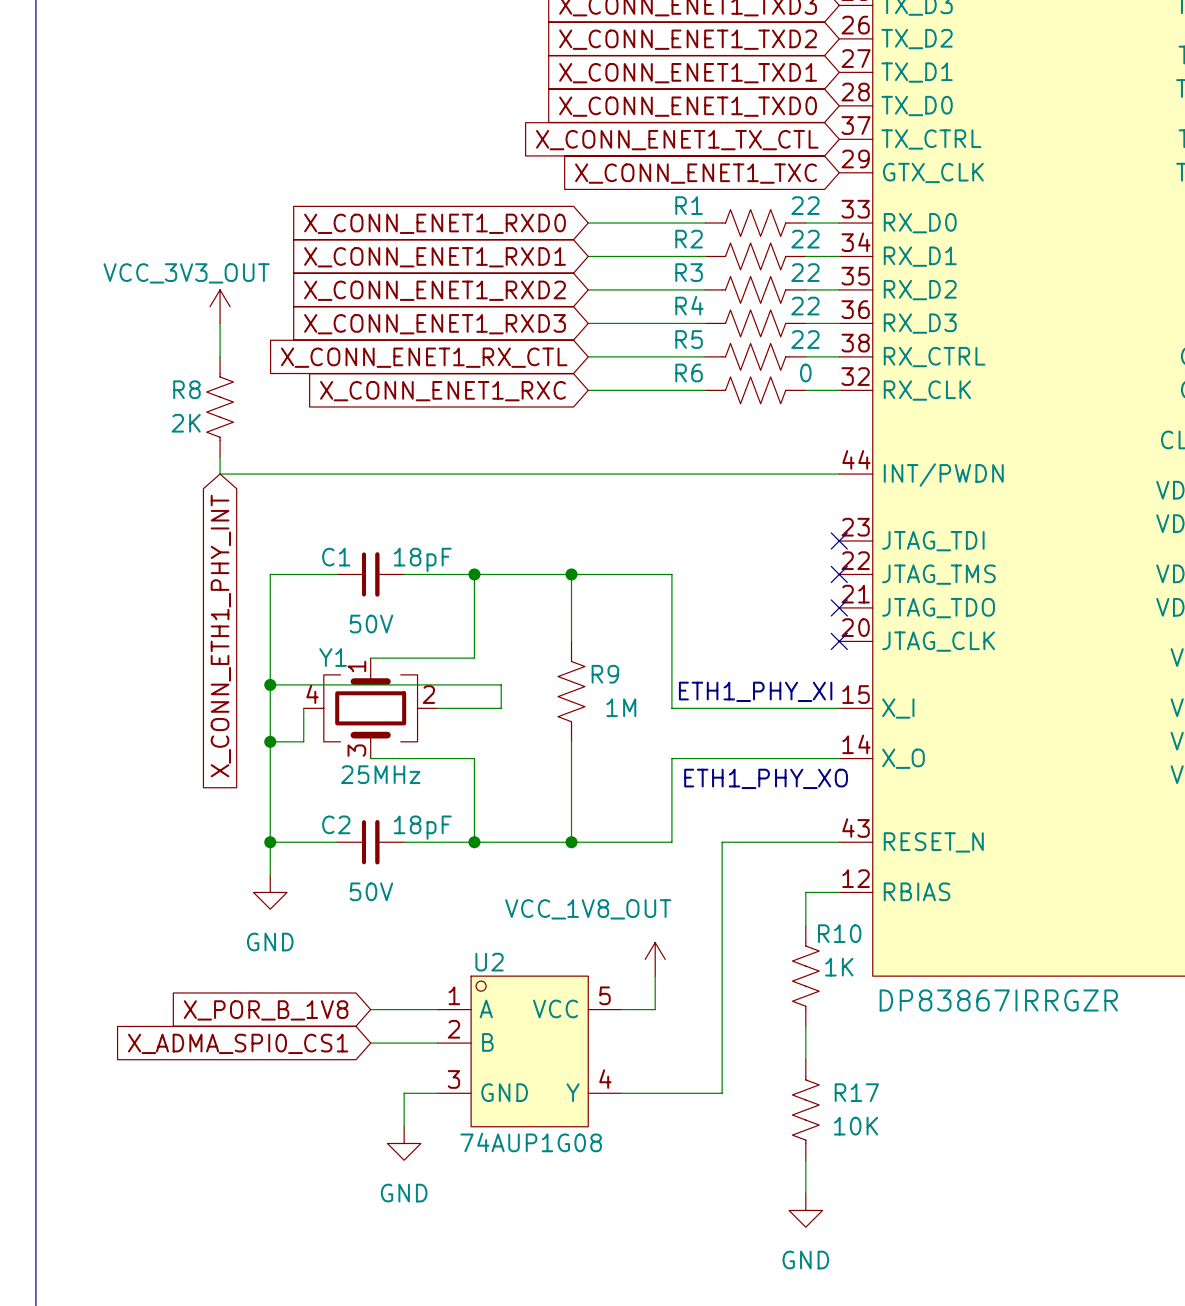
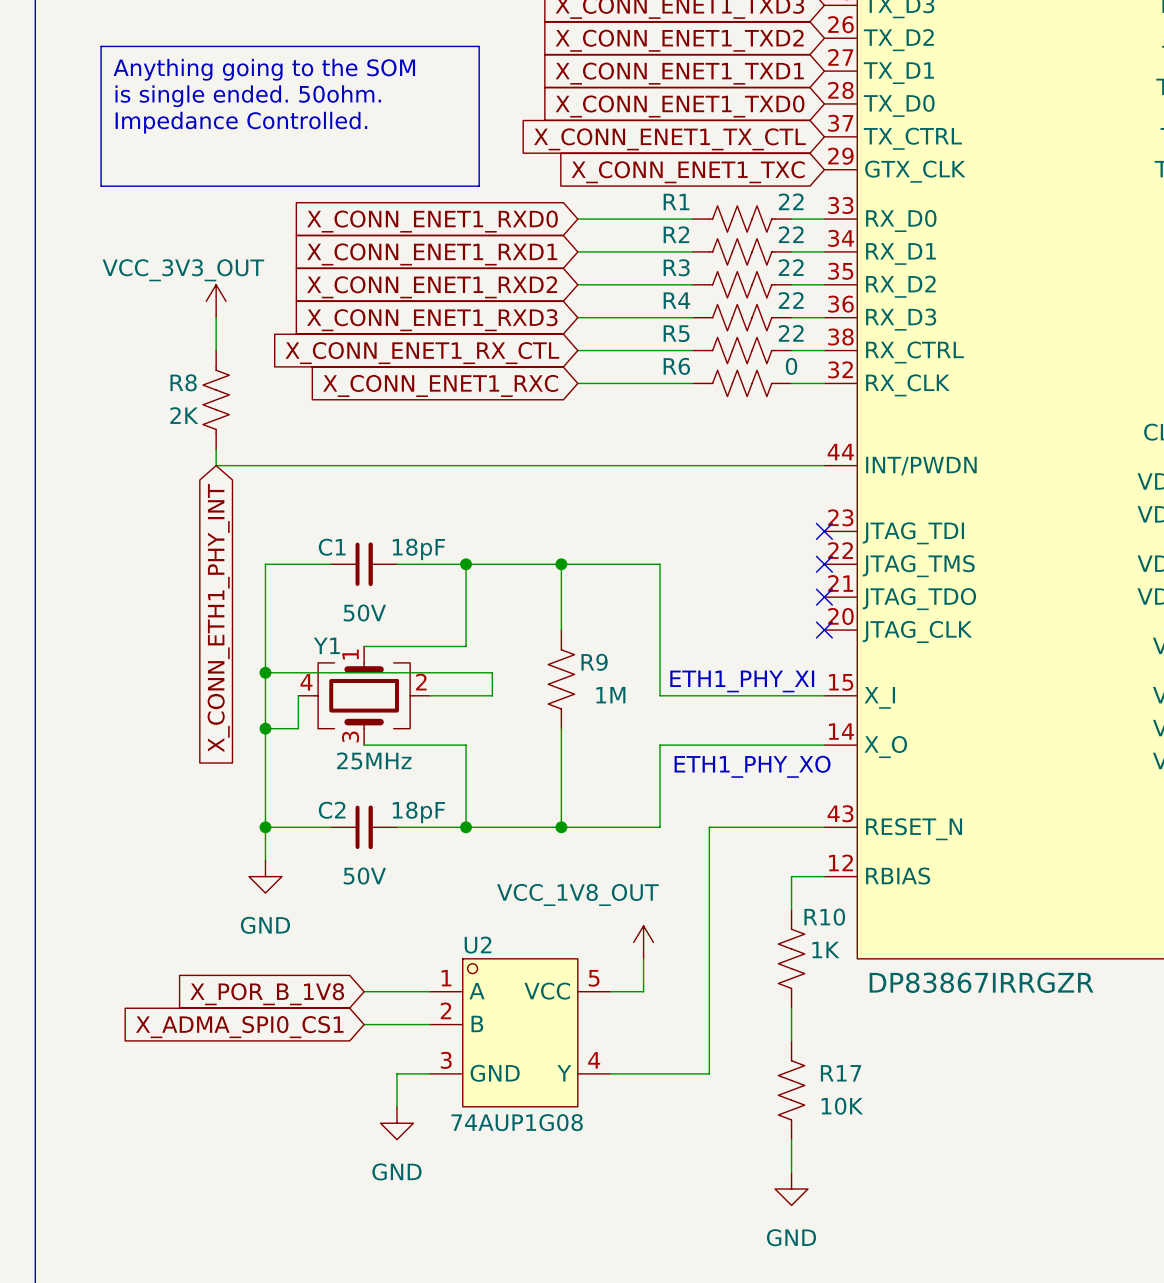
line: none -> (101, 46) (479, 46) (479, 186) (101, 186) (101, 46)
text: none -> Anything going to the SOM (264, 69)
text: none -> is single ended. 50ohm. (248, 96)
text: none -> Impedance Controlled. (241, 122)

